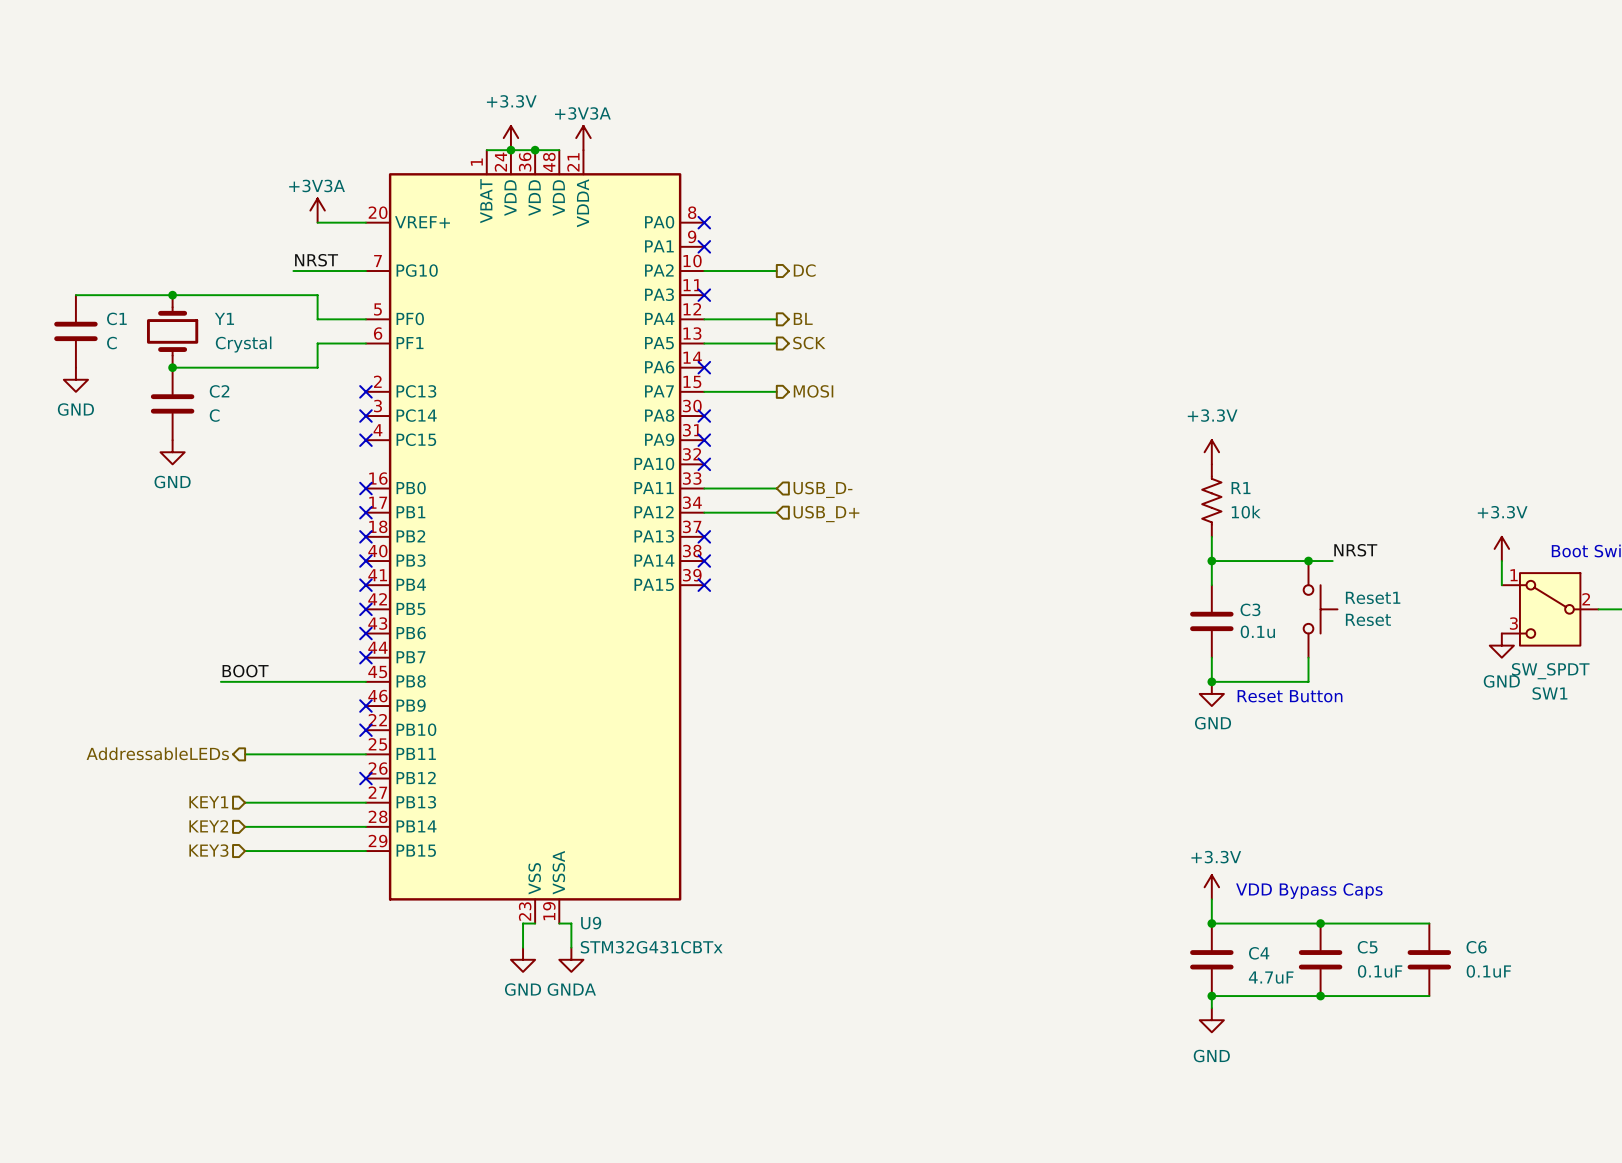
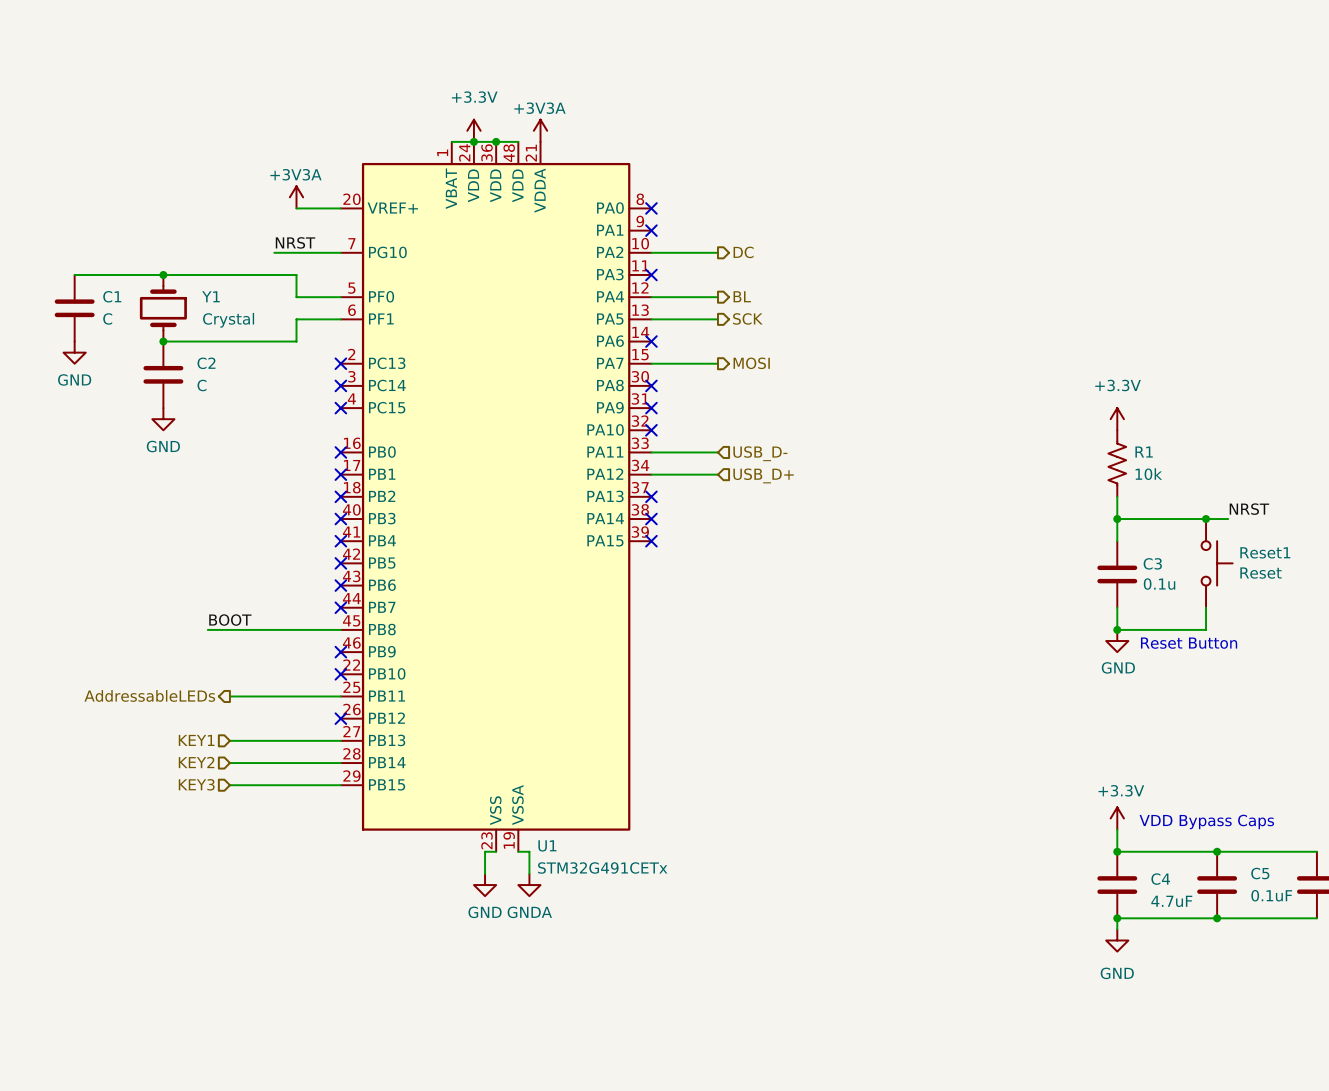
U9 name: U9 (591, 923) -> U1 (547, 845)
U9 value: STM32G431CBTx (651, 947) -> STM32G491CETx (602, 867)

